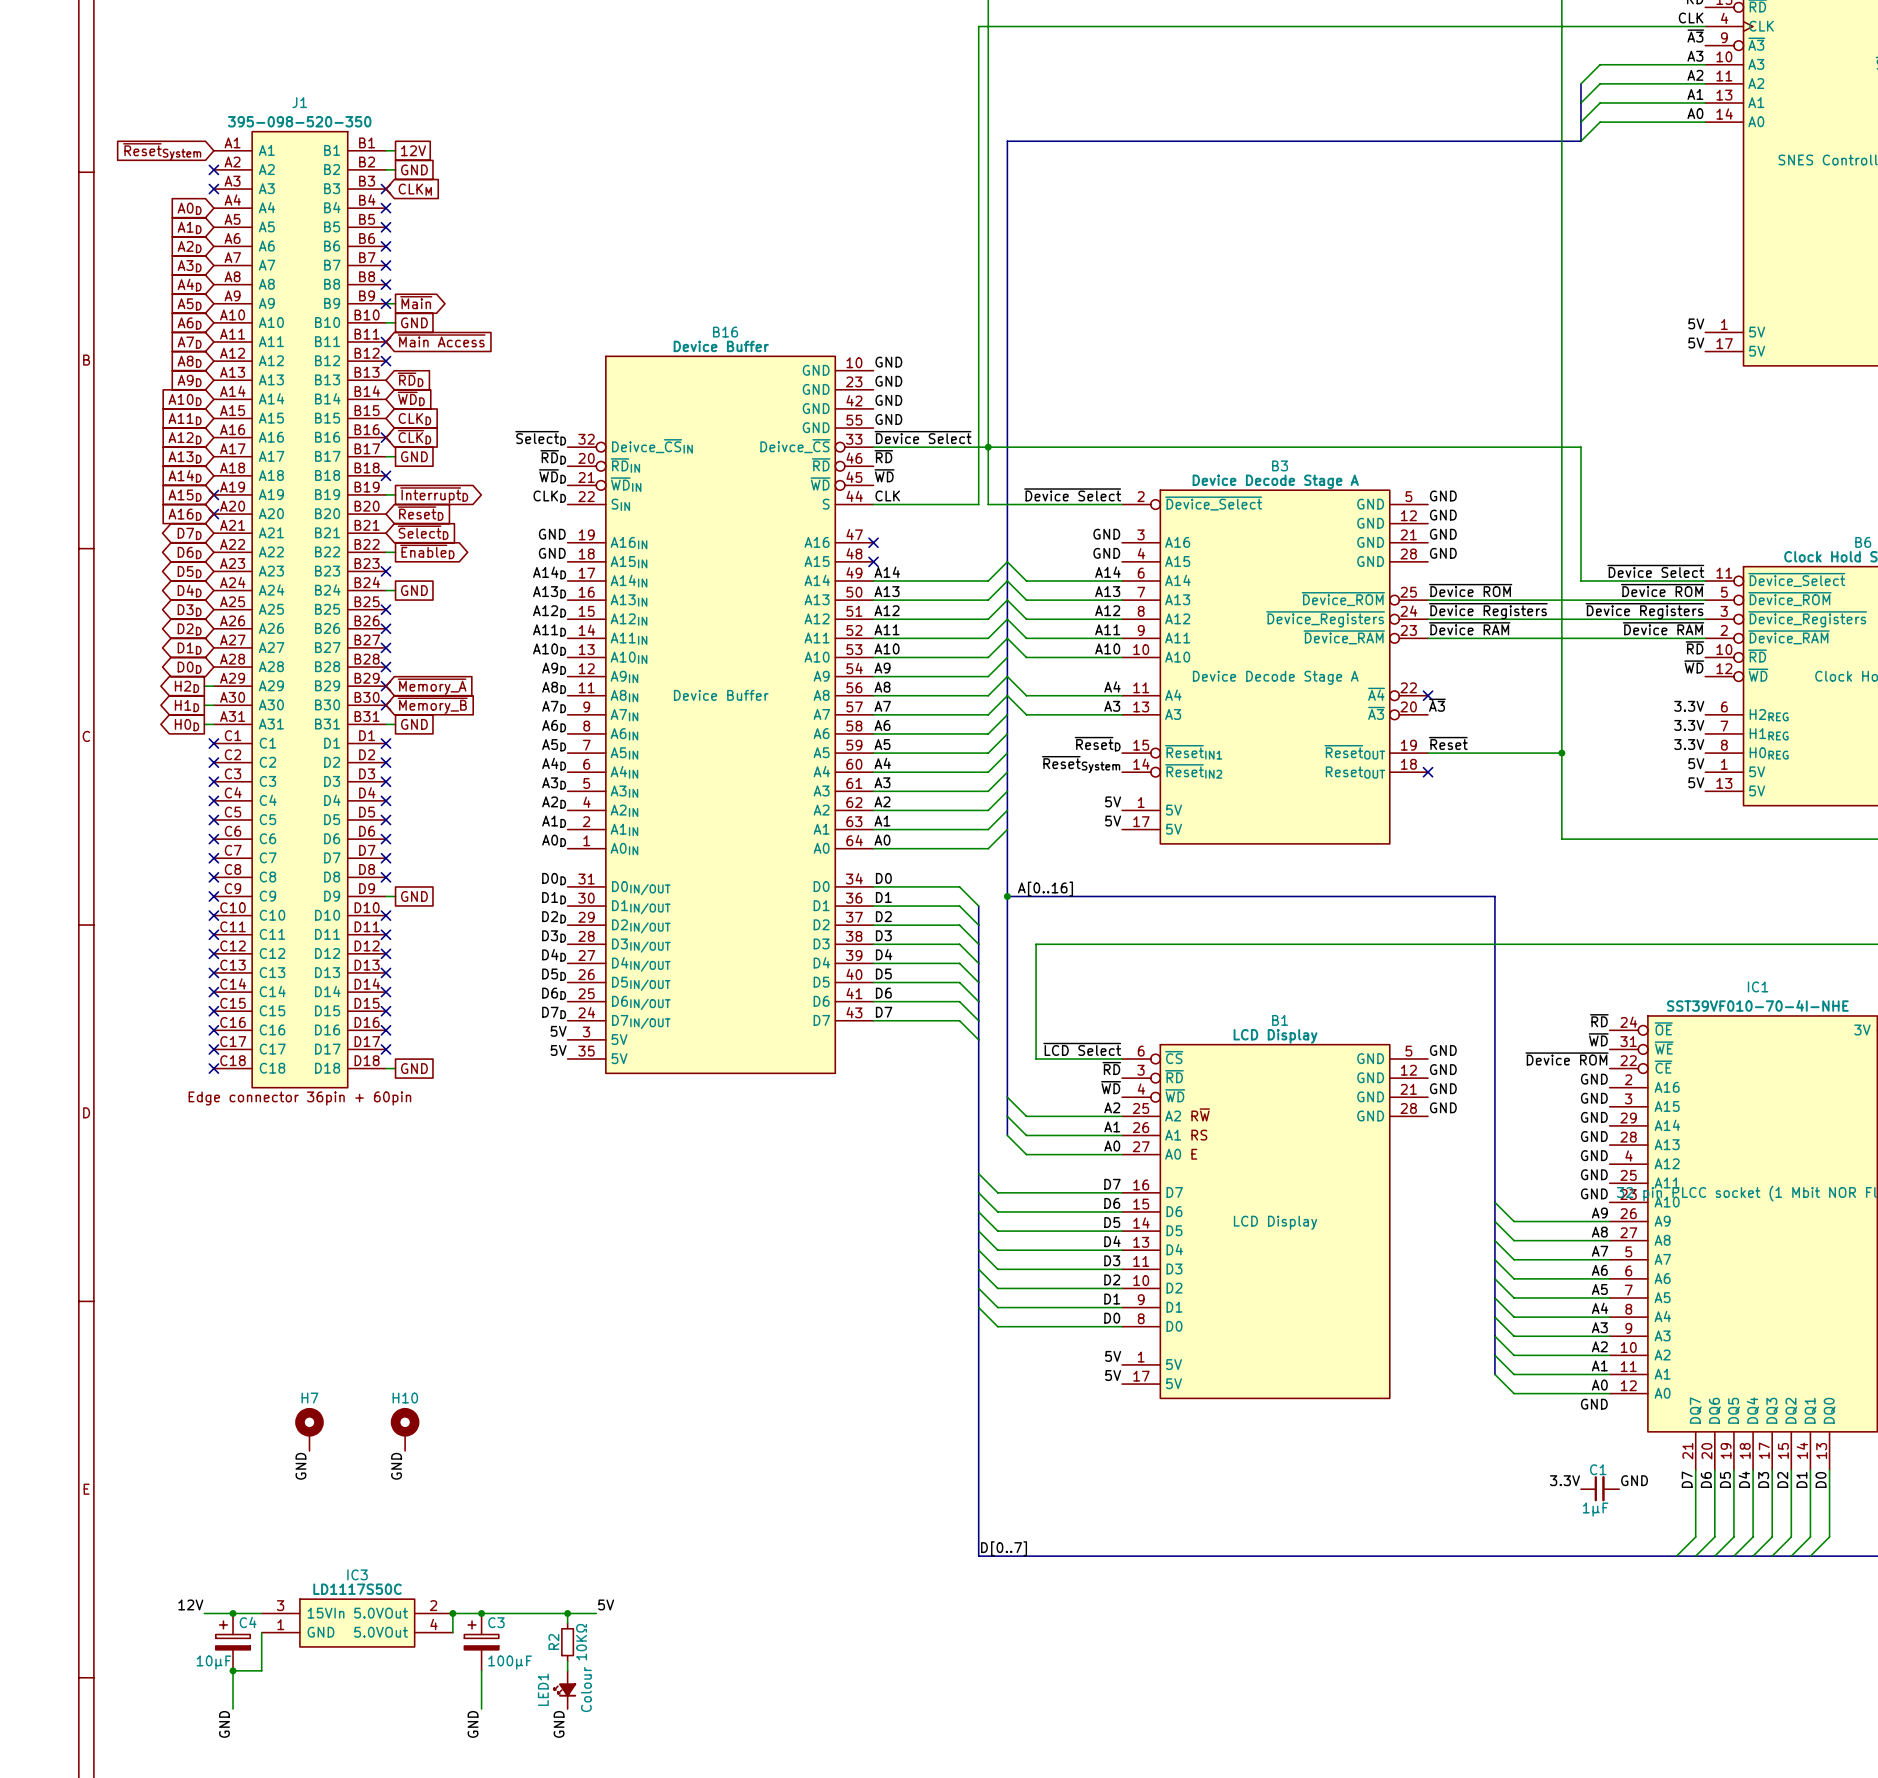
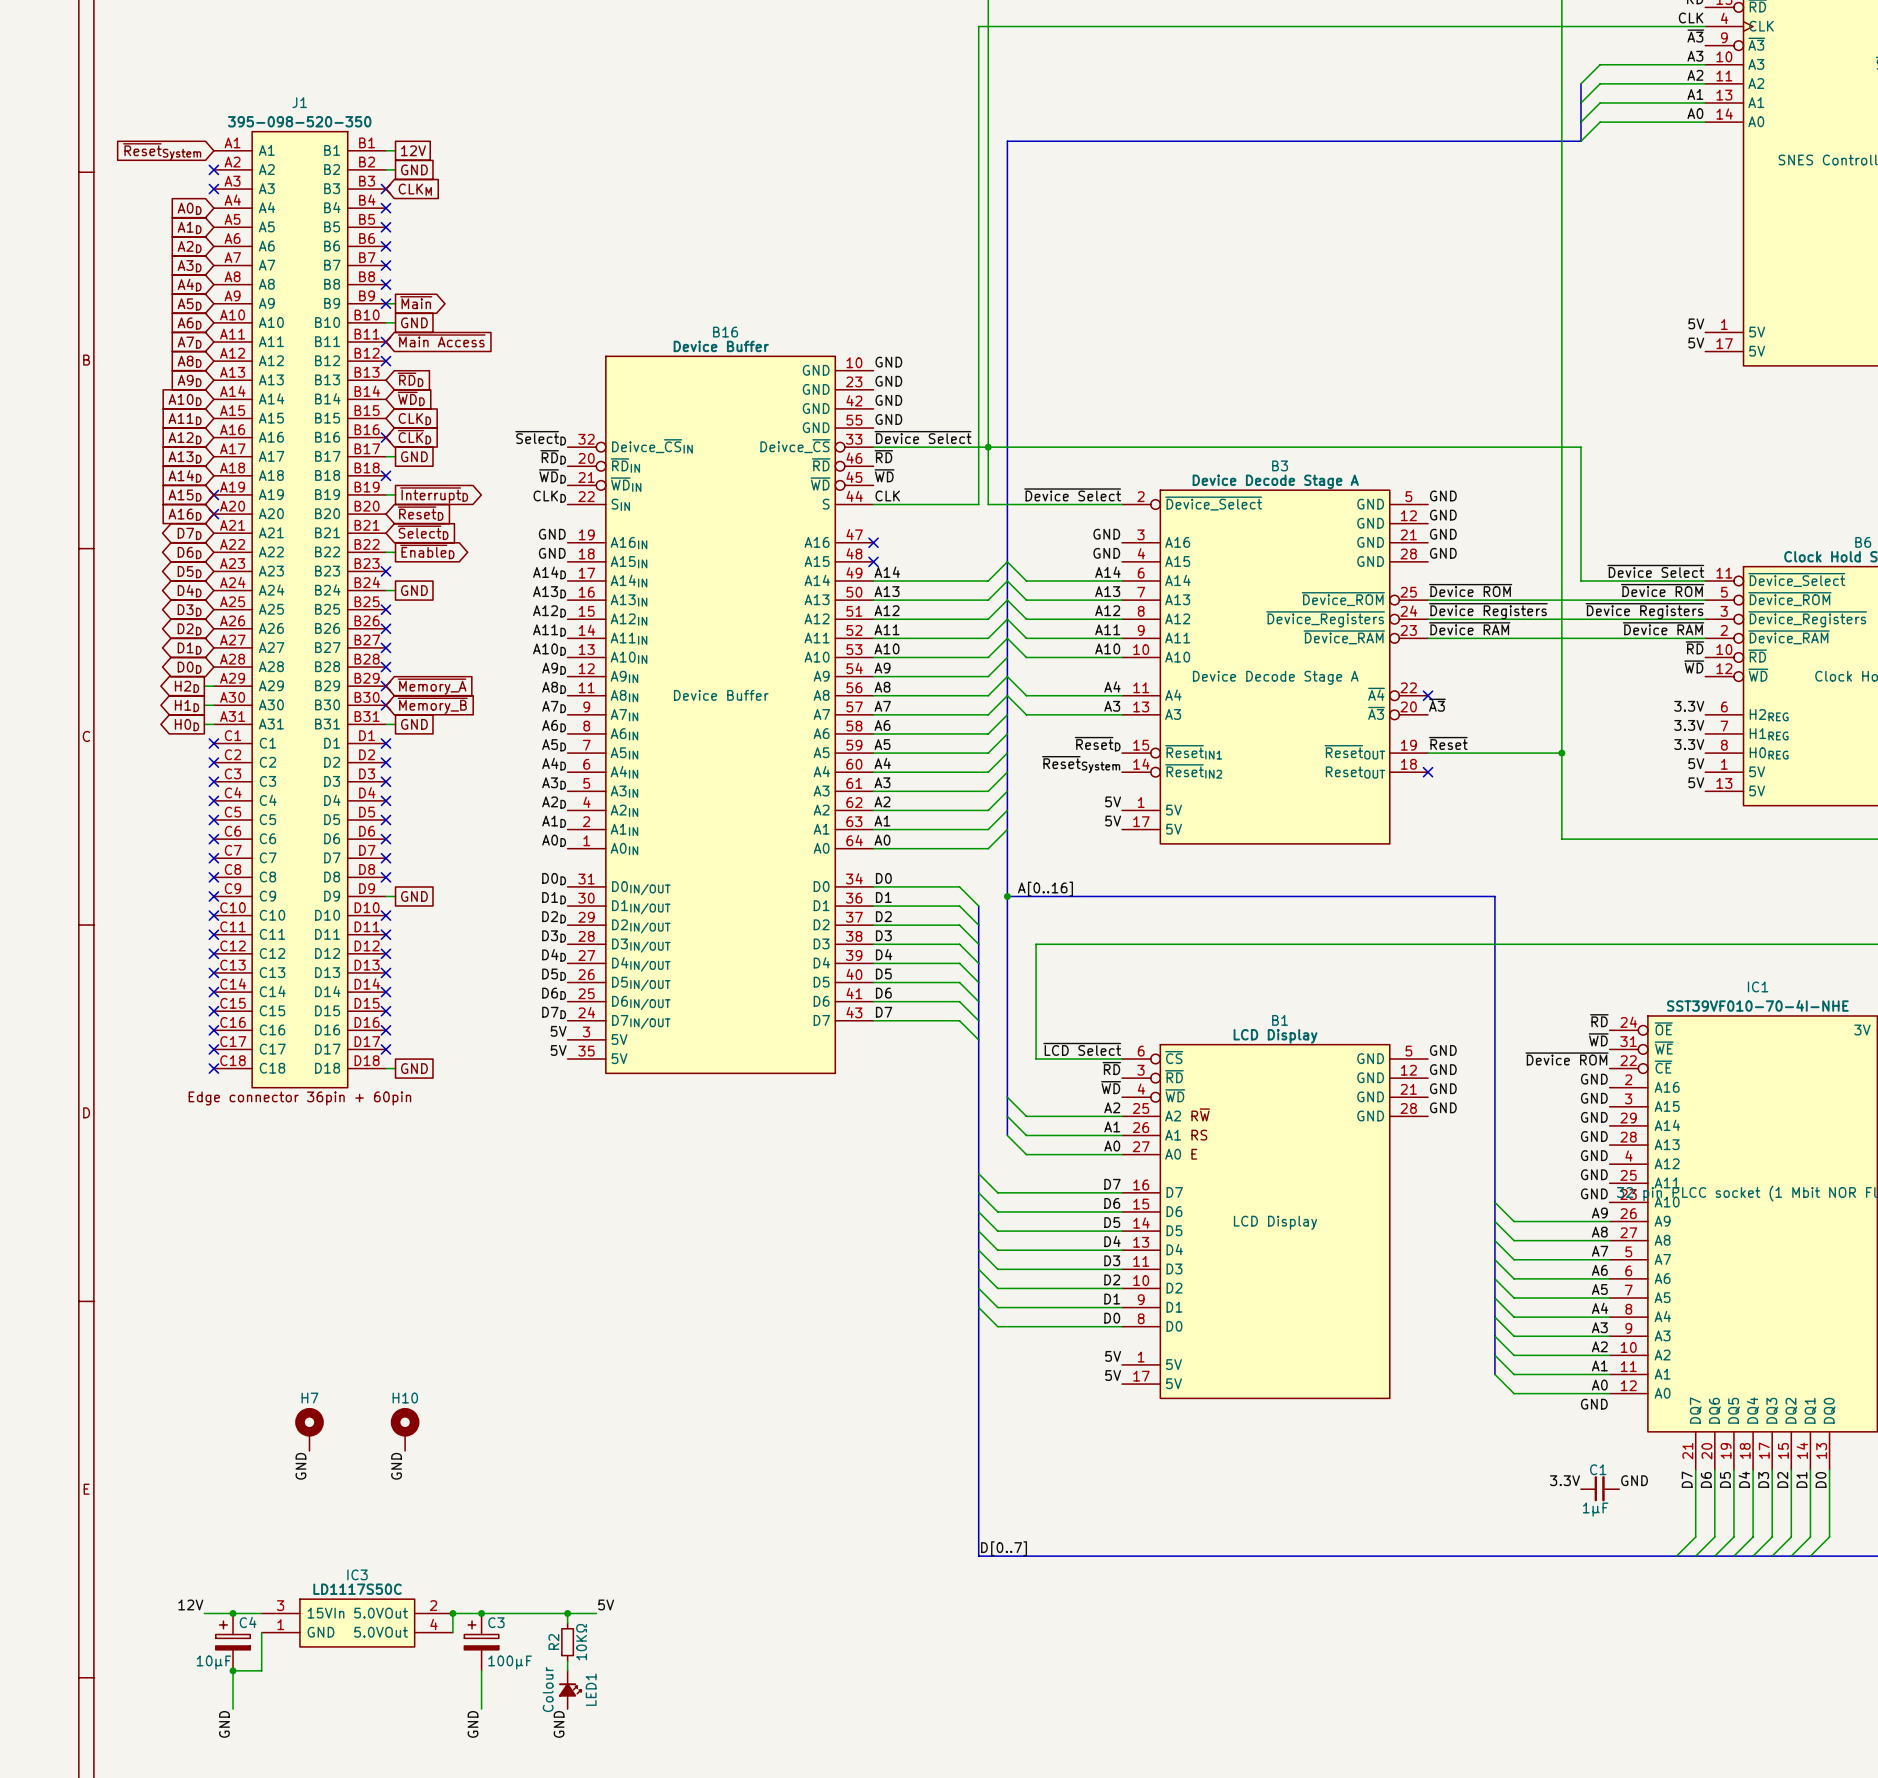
LED1 rotation: 0° (565, 1689) -> 180° (570, 1689)

